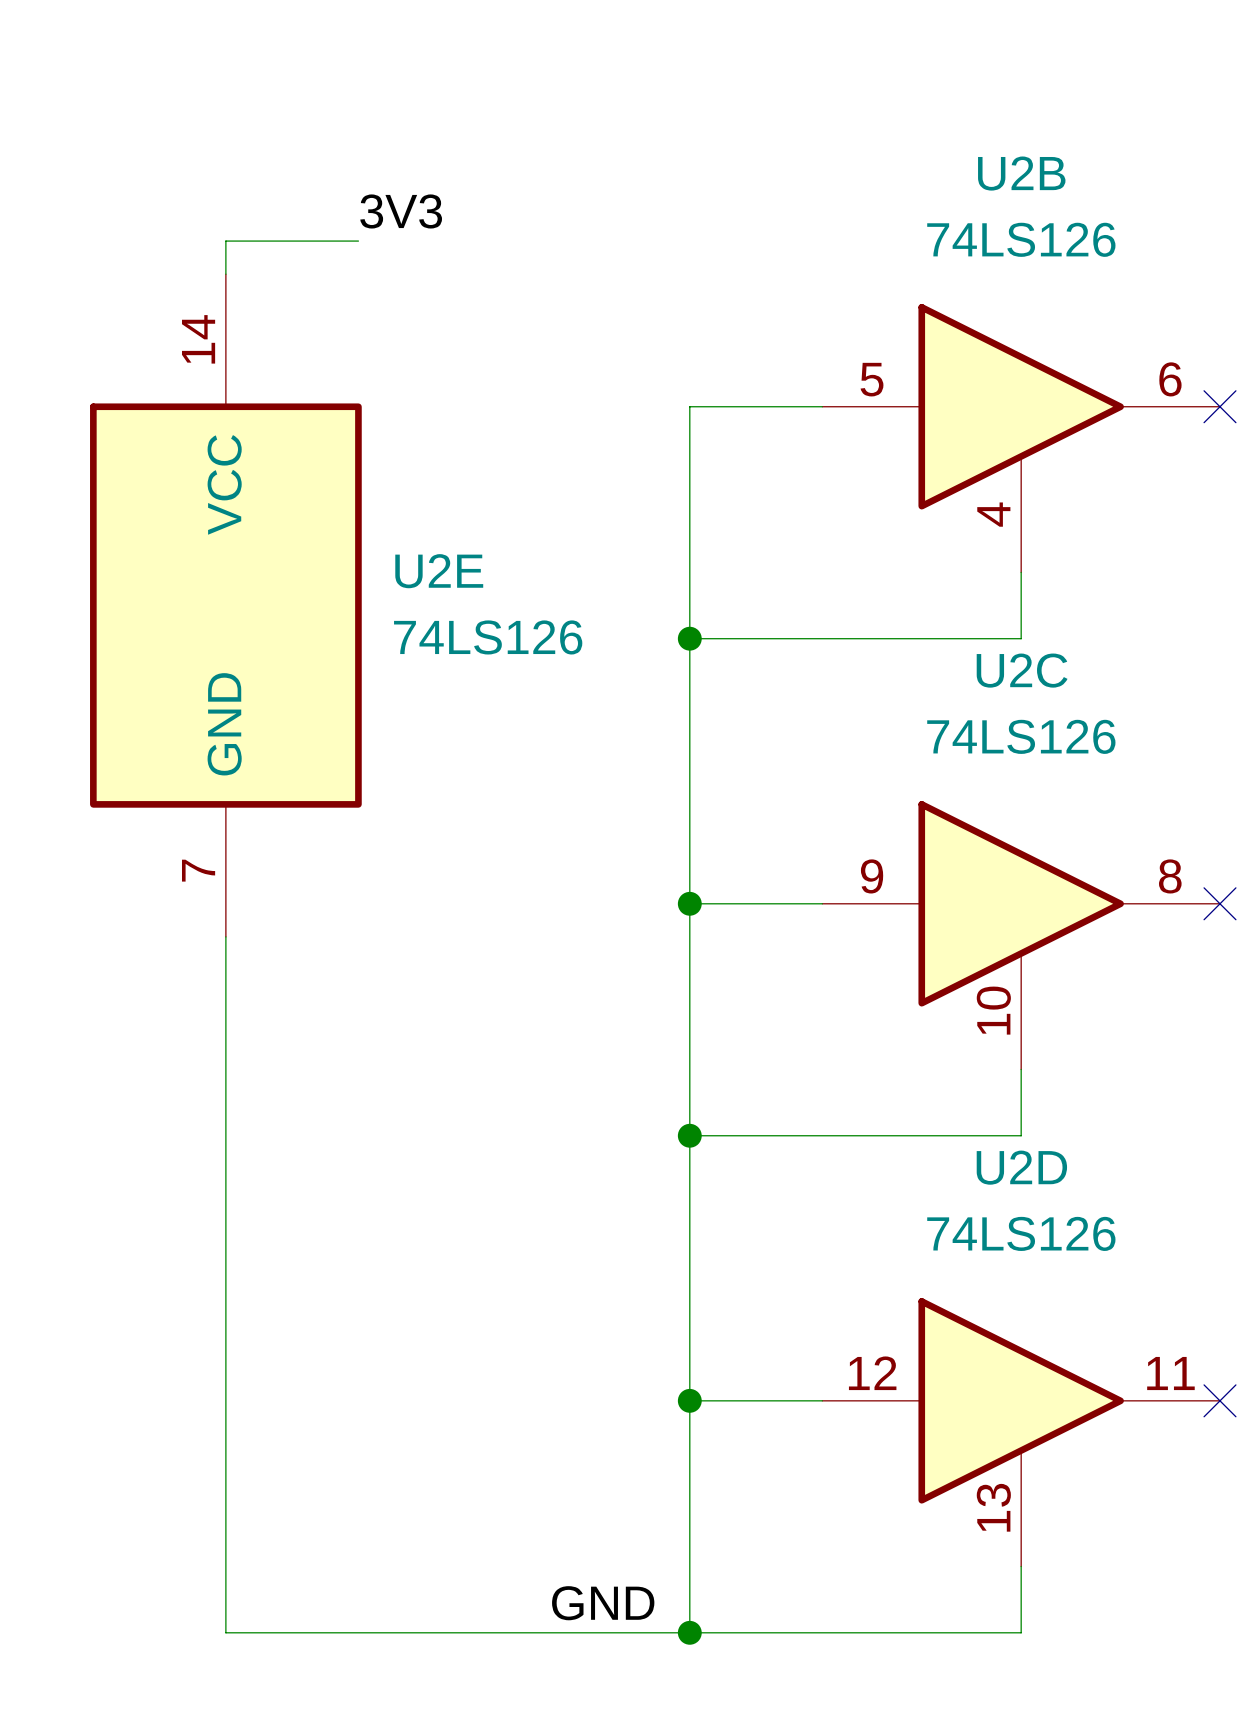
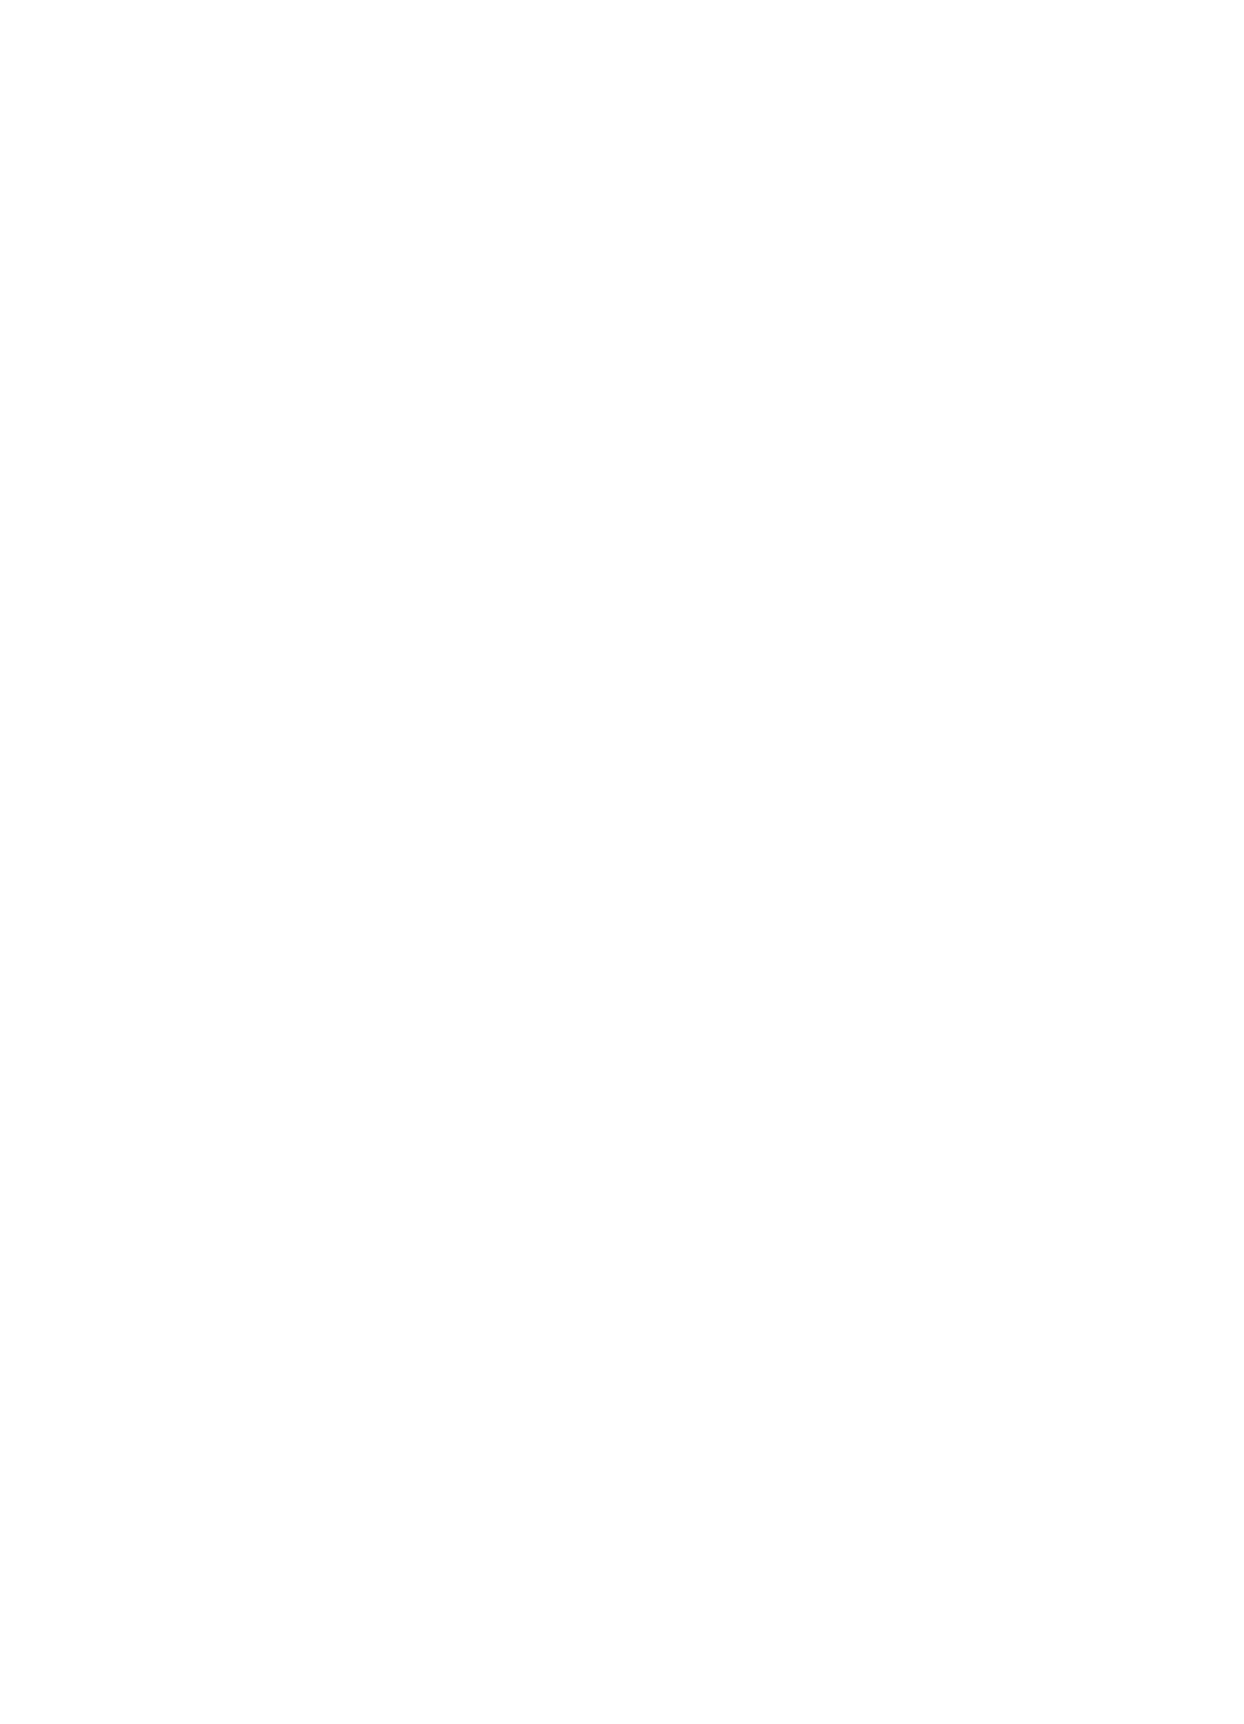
label: 3V3 (401, 211) -> none
wire: (358, 241) (225, 241) (225, 274) -> none
wire: (822, 406) (689, 406) (689, 1632) -> none
no-connect mark: (1219, 406) -> none
U2B: 74LS126 (1021, 438) -> none
wire: (1021, 572) (1021, 638) (689, 638) -> none
U2E: 74LS126 (225, 605) -> none
junction: (689, 638) -> none
wire: (689, 903) (822, 903) -> none
junction: (689, 903) -> none
no-connect mark: (1219, 903) -> none
U2C: 74LS126 (1021, 935) -> none
wire: (225, 936) (225, 1632) (1021, 1632) (1021, 1566) -> none
wire: (1021, 1069) (1021, 1135) (689, 1135) -> none
junction: (689, 1135) -> none
wire: (689, 1400) (822, 1400) -> none
junction: (689, 1400) -> none
no-connect mark: (1219, 1400) -> none
U2D: 74LS126 (1021, 1432) -> none
label: GND (603, 1603) -> none
junction: (689, 1632) -> none

